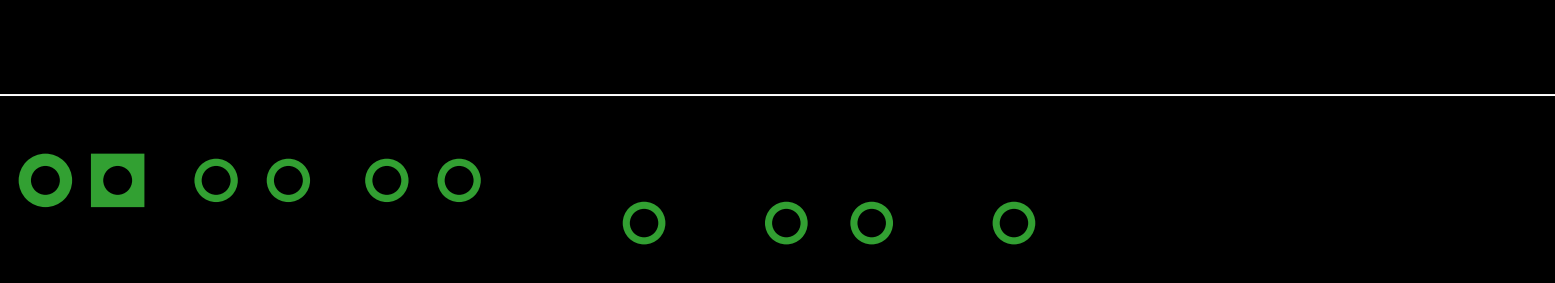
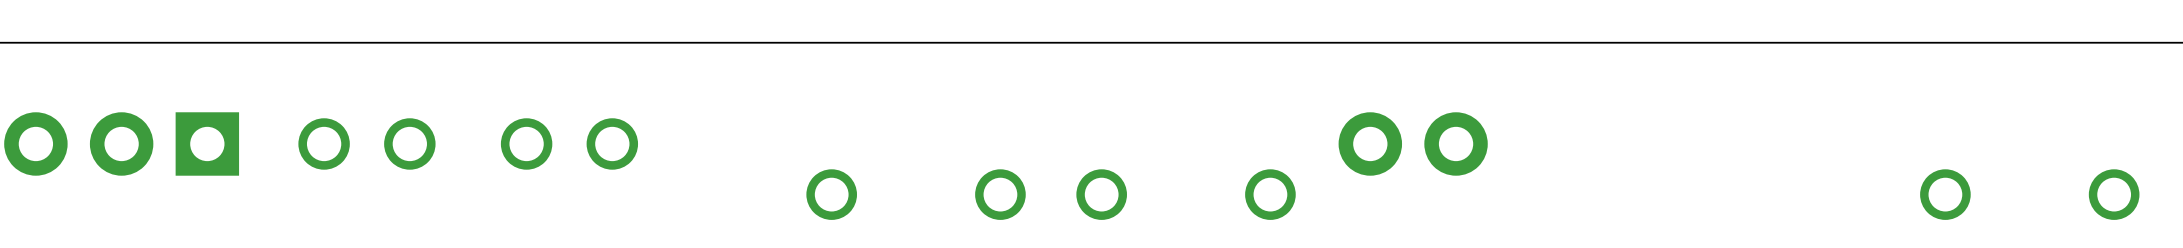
part: none -> (1413, 143)

